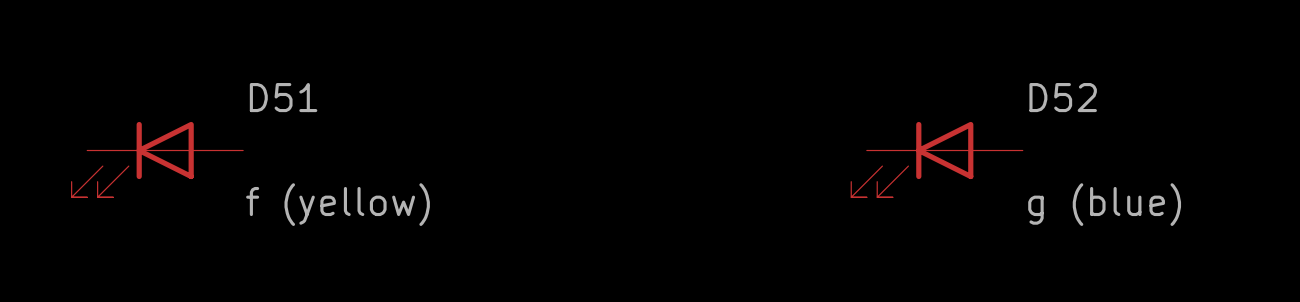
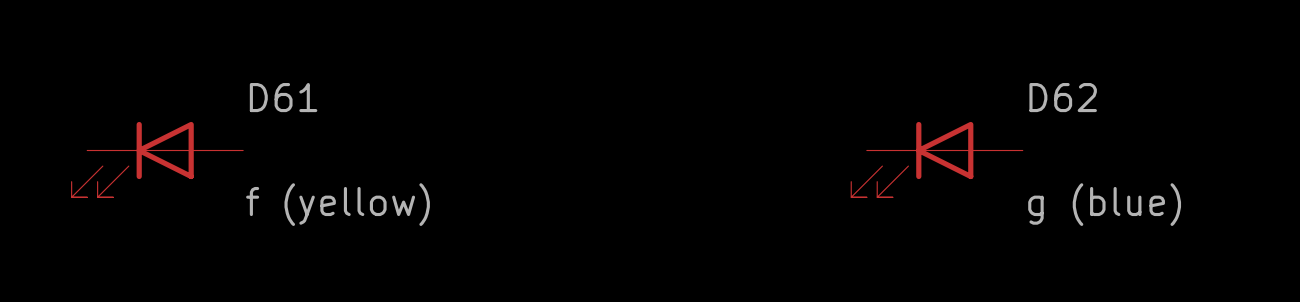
D51 name: D51 (283, 97) -> D61 (283, 97)
D52 name: D52 (1063, 97) -> D62 (1063, 97)

